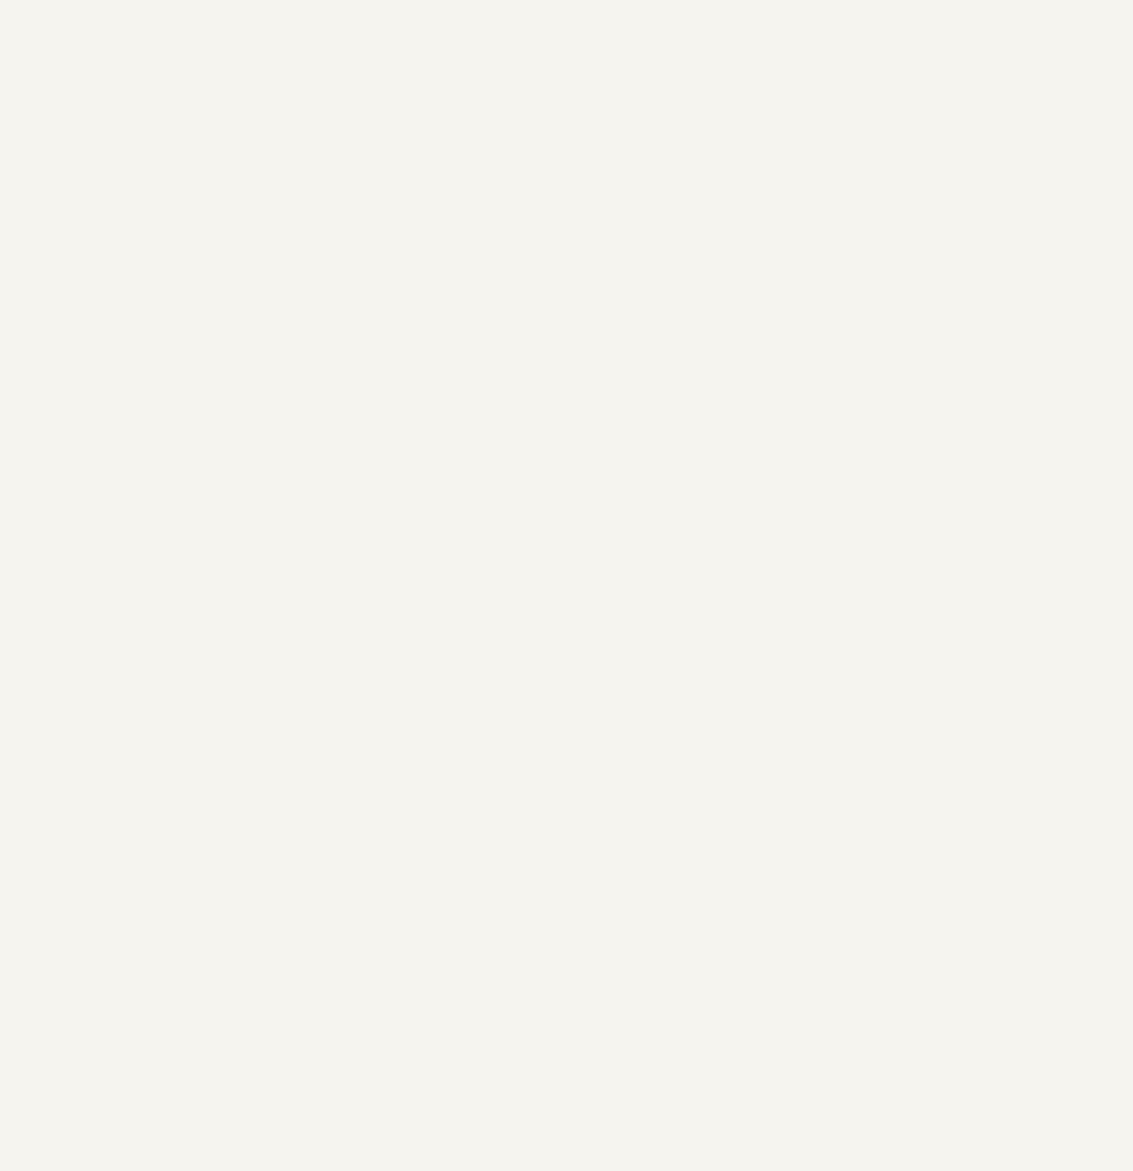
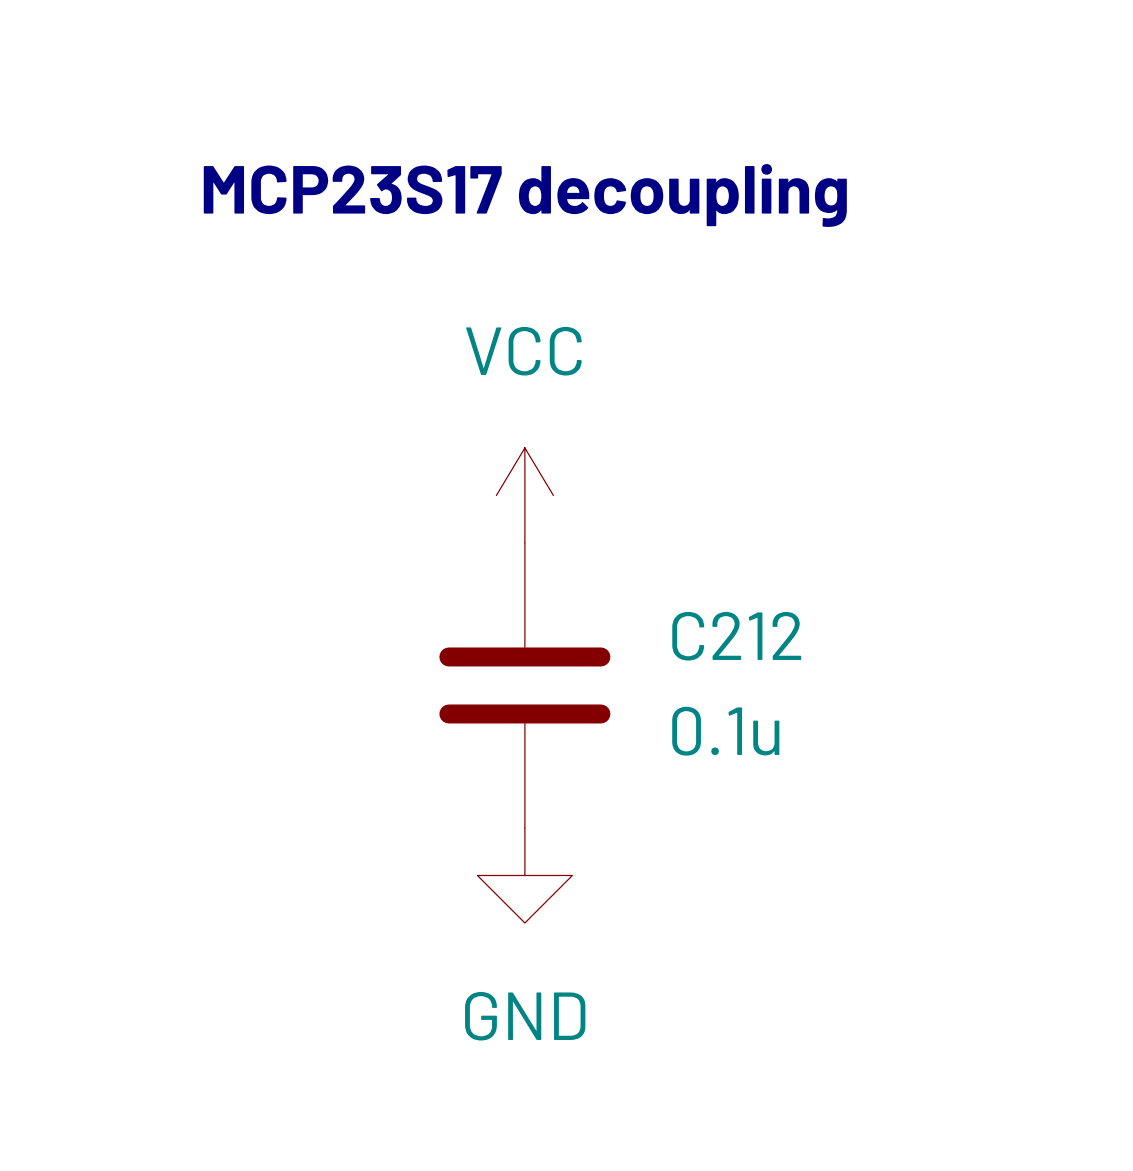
text: none -> MCP23S17 decoupling (525, 195)
power symbol: none -> VCC (524, 495)
C212: none -> 0.1u (524, 685)
power symbol: none -> GND (524, 875)

